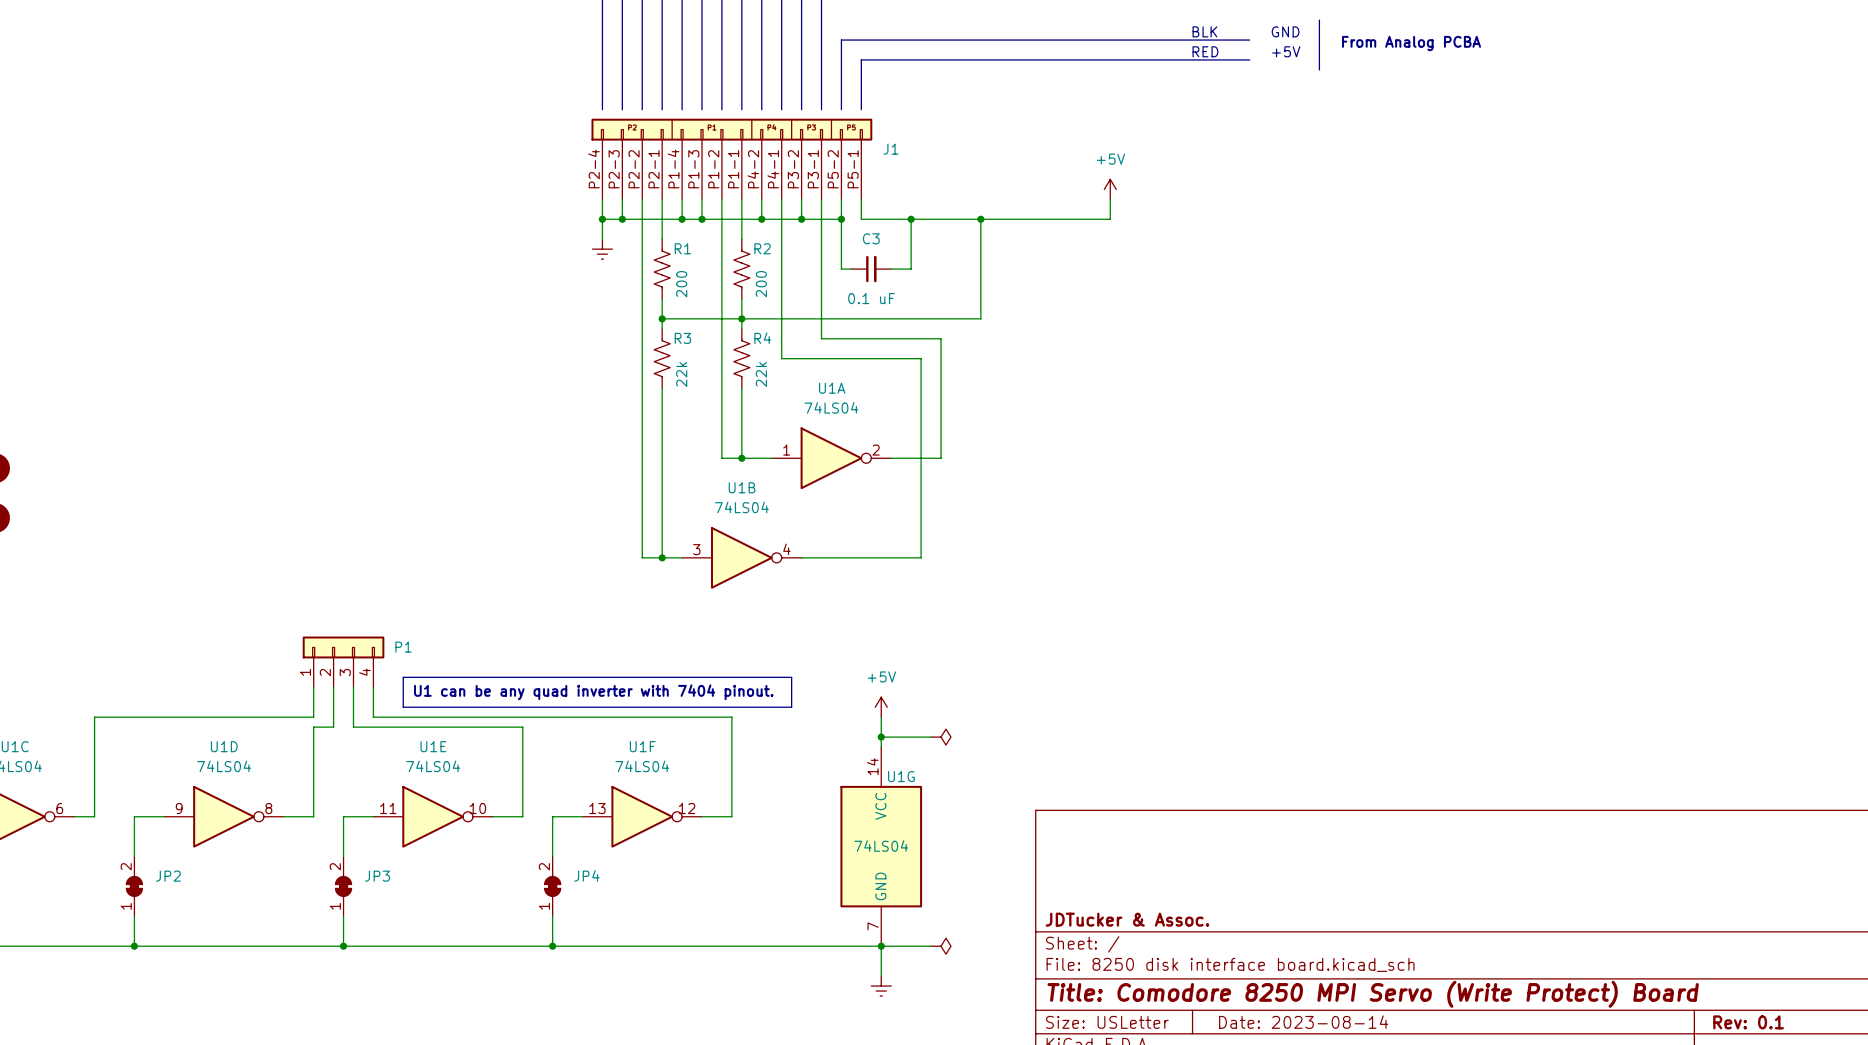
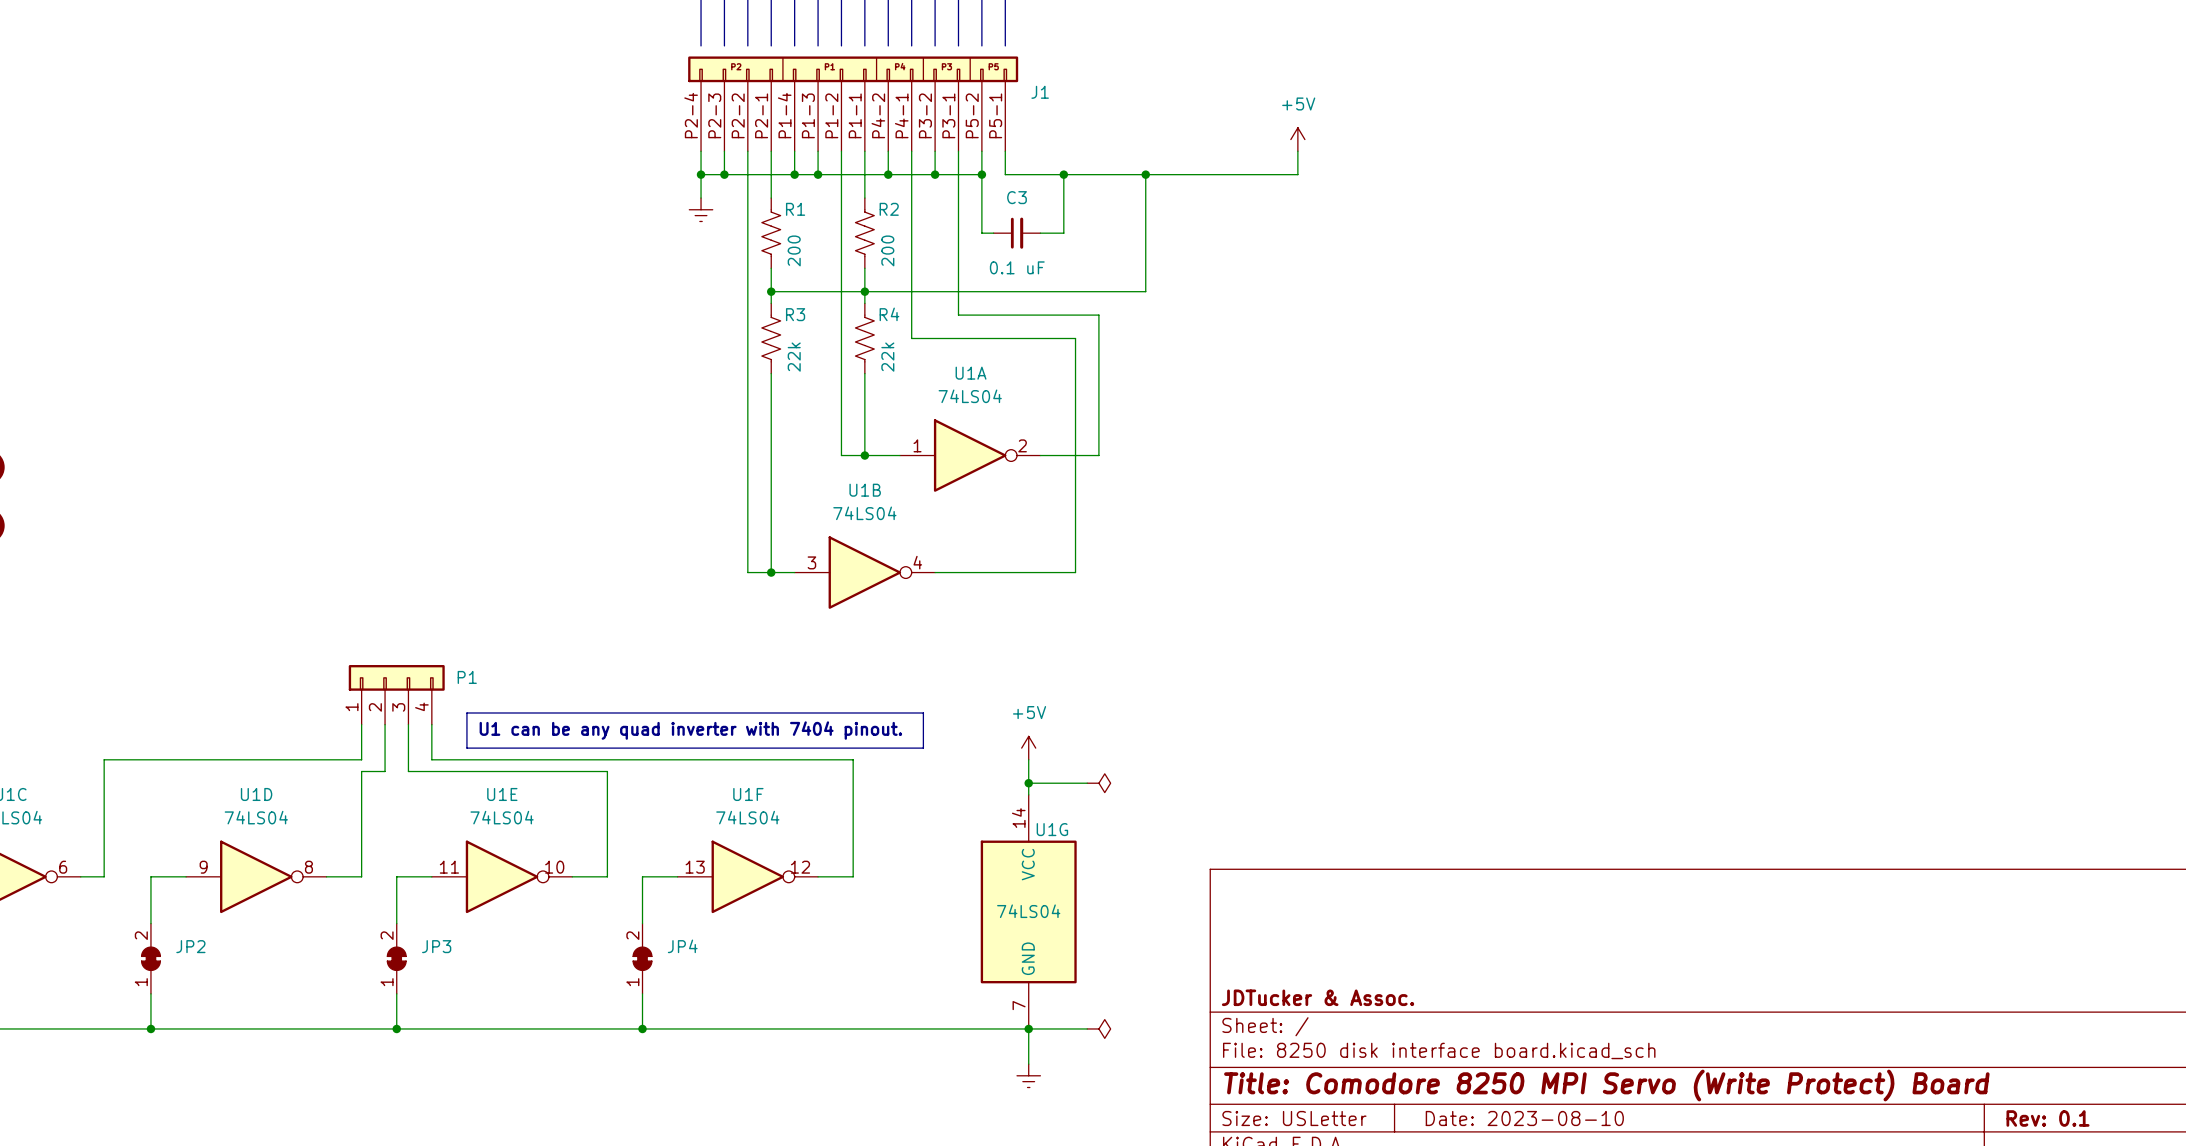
title block: Date: 2023-08-14 (1303, 1022) -> Date: 2023-08-10 (1524, 1118)

